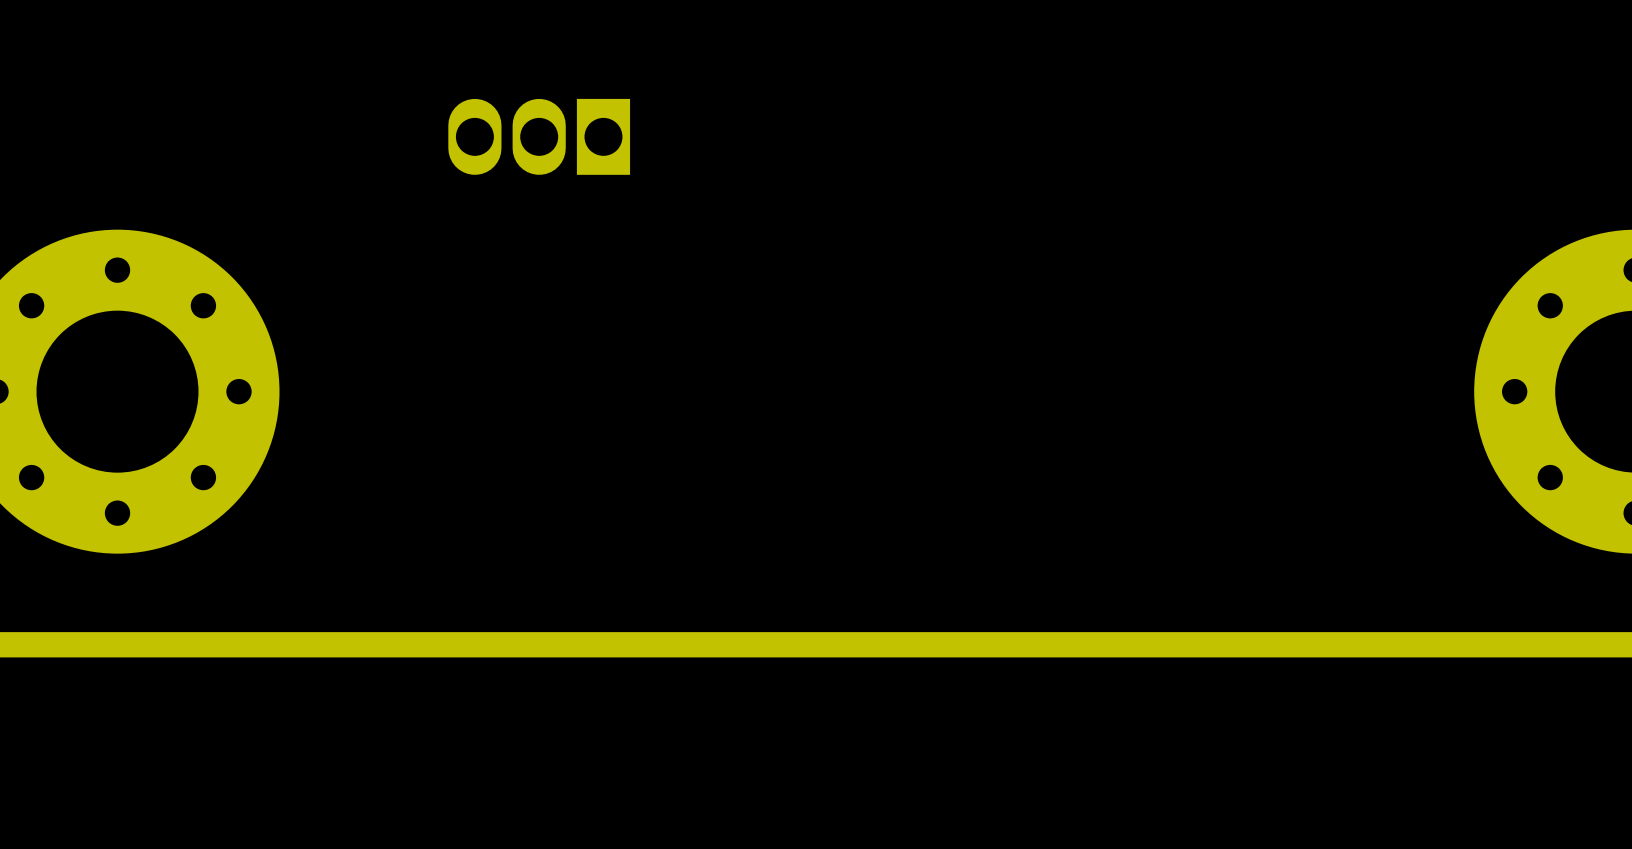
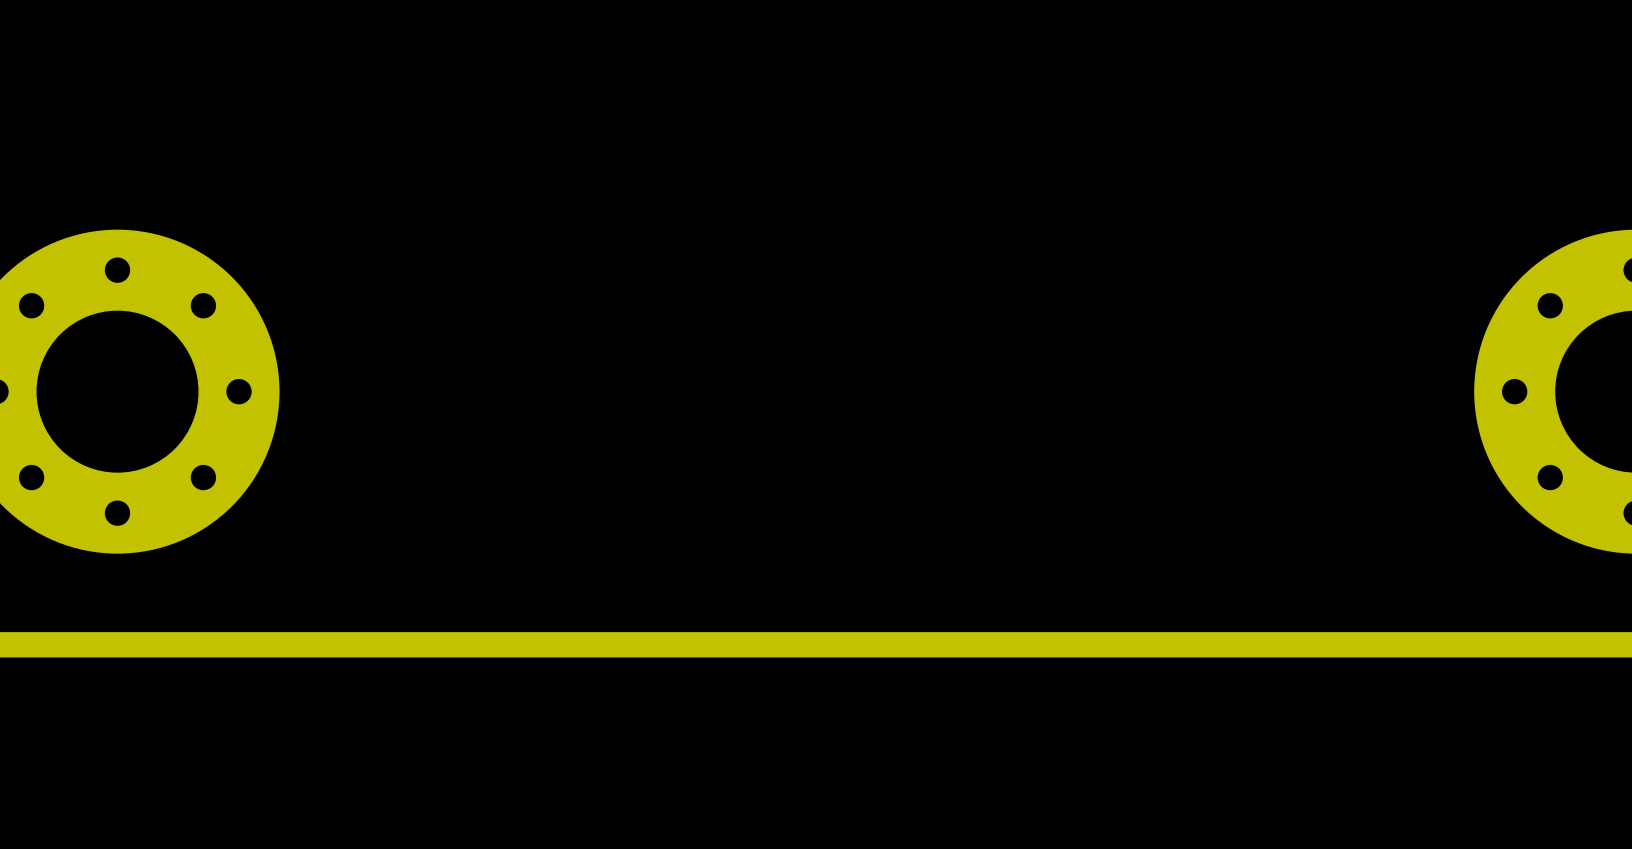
part: (539, 136) -> none

